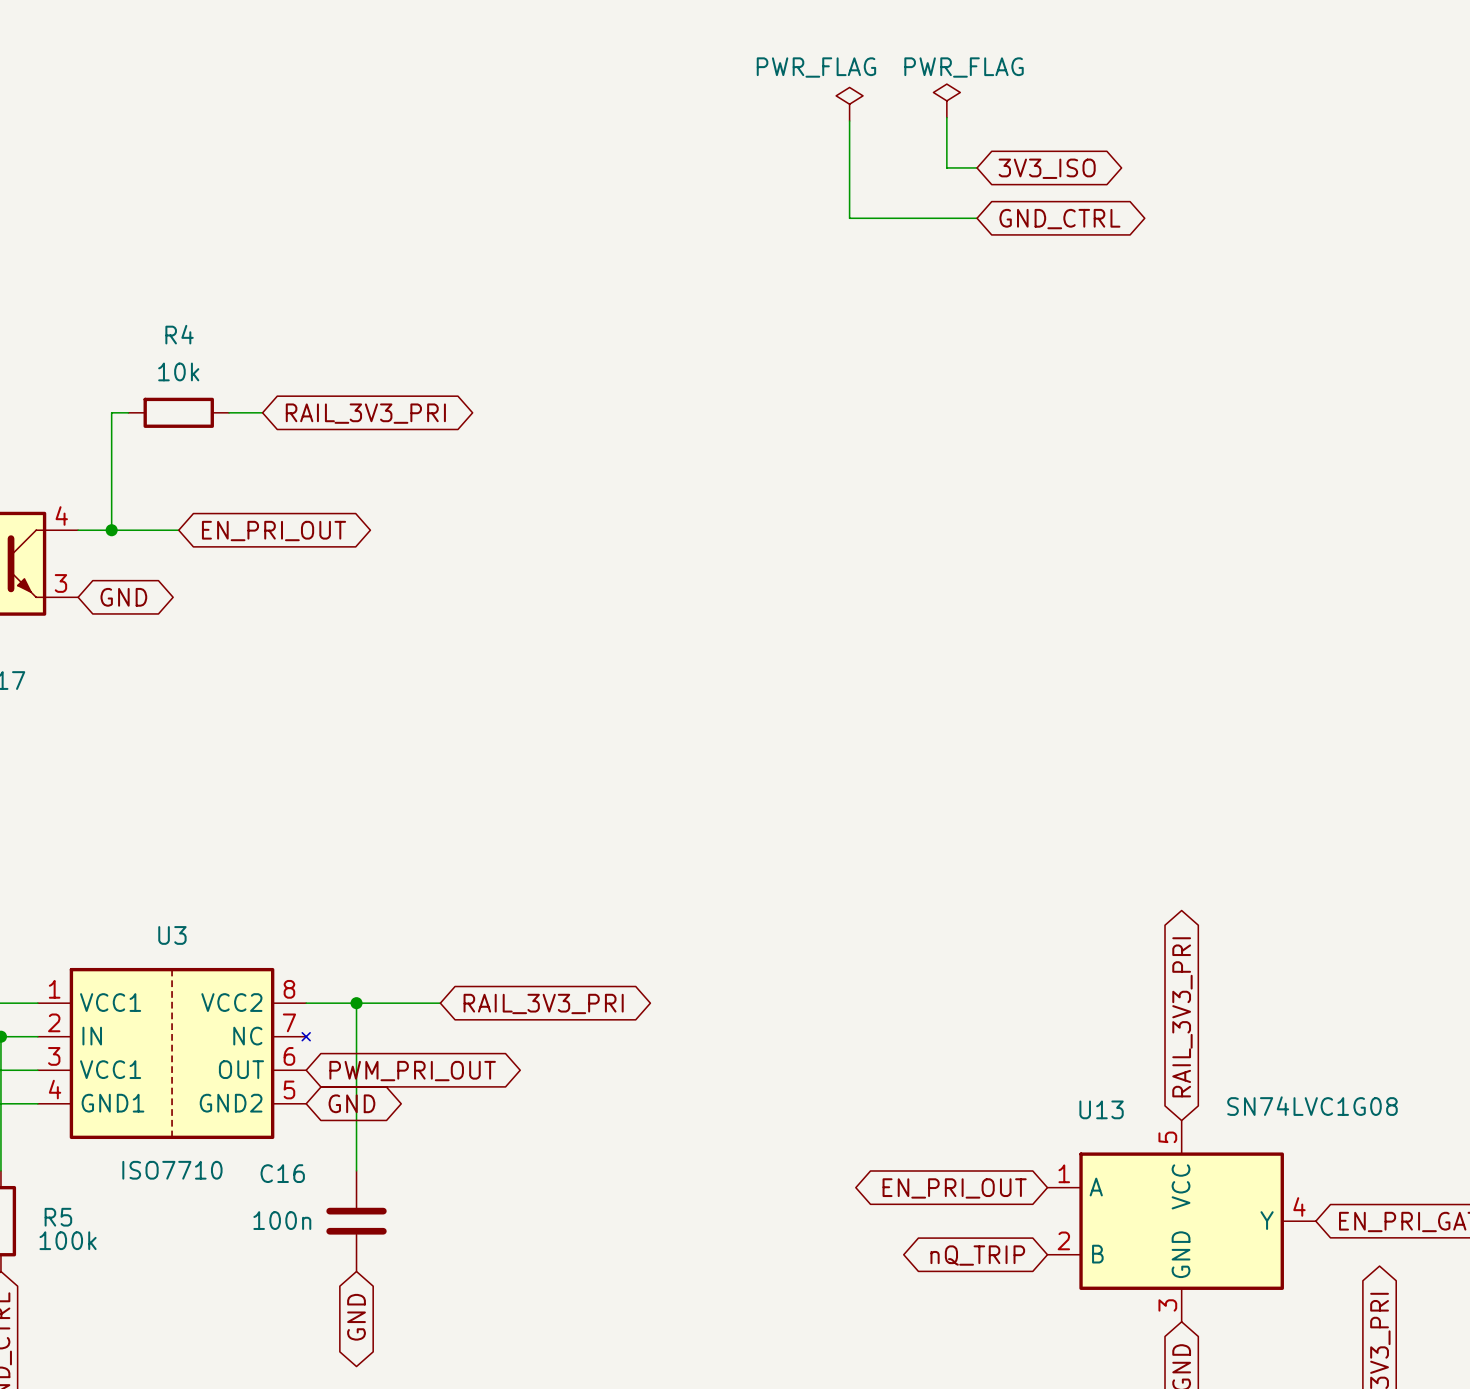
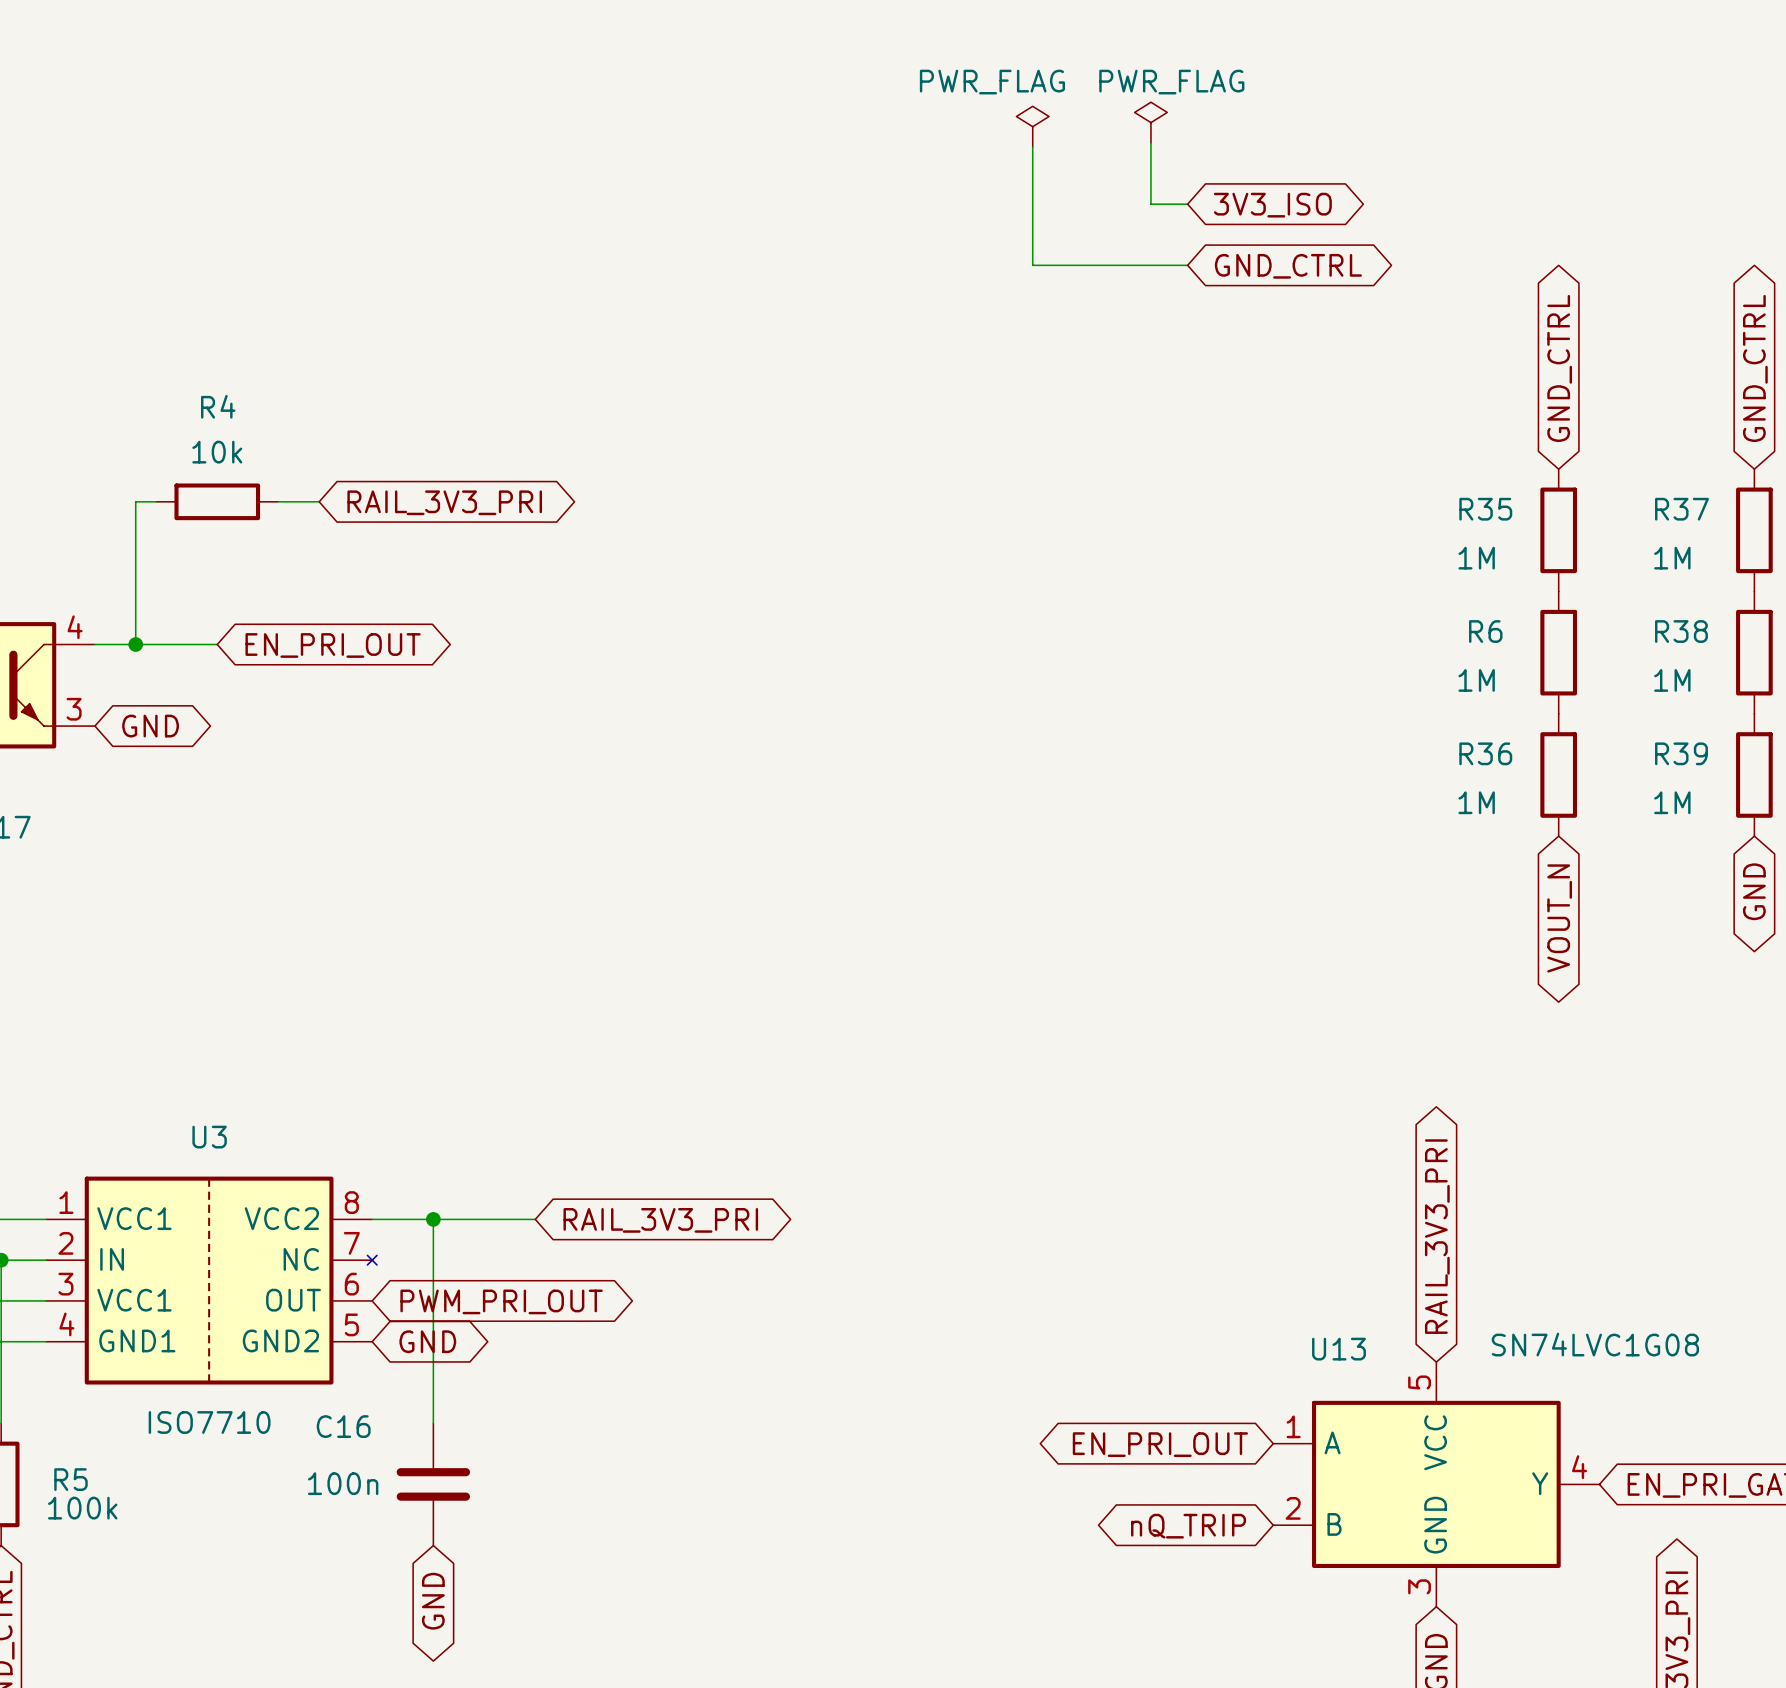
global label: none -> GND_CTRL (1559, 368)
global label: none -> GND_CTRL (1755, 368)
R35: none -> 1M (1558, 530)
R37: none -> 1M (1754, 530)
R6: none -> 1M (1558, 652)
R38: none -> 1M (1754, 652)
R36: none -> 1M (1558, 774)
R39: none -> 1M (1754, 774)
global label: none -> GND (1754, 891)
global label: none -> VOUT_N (1559, 918)

